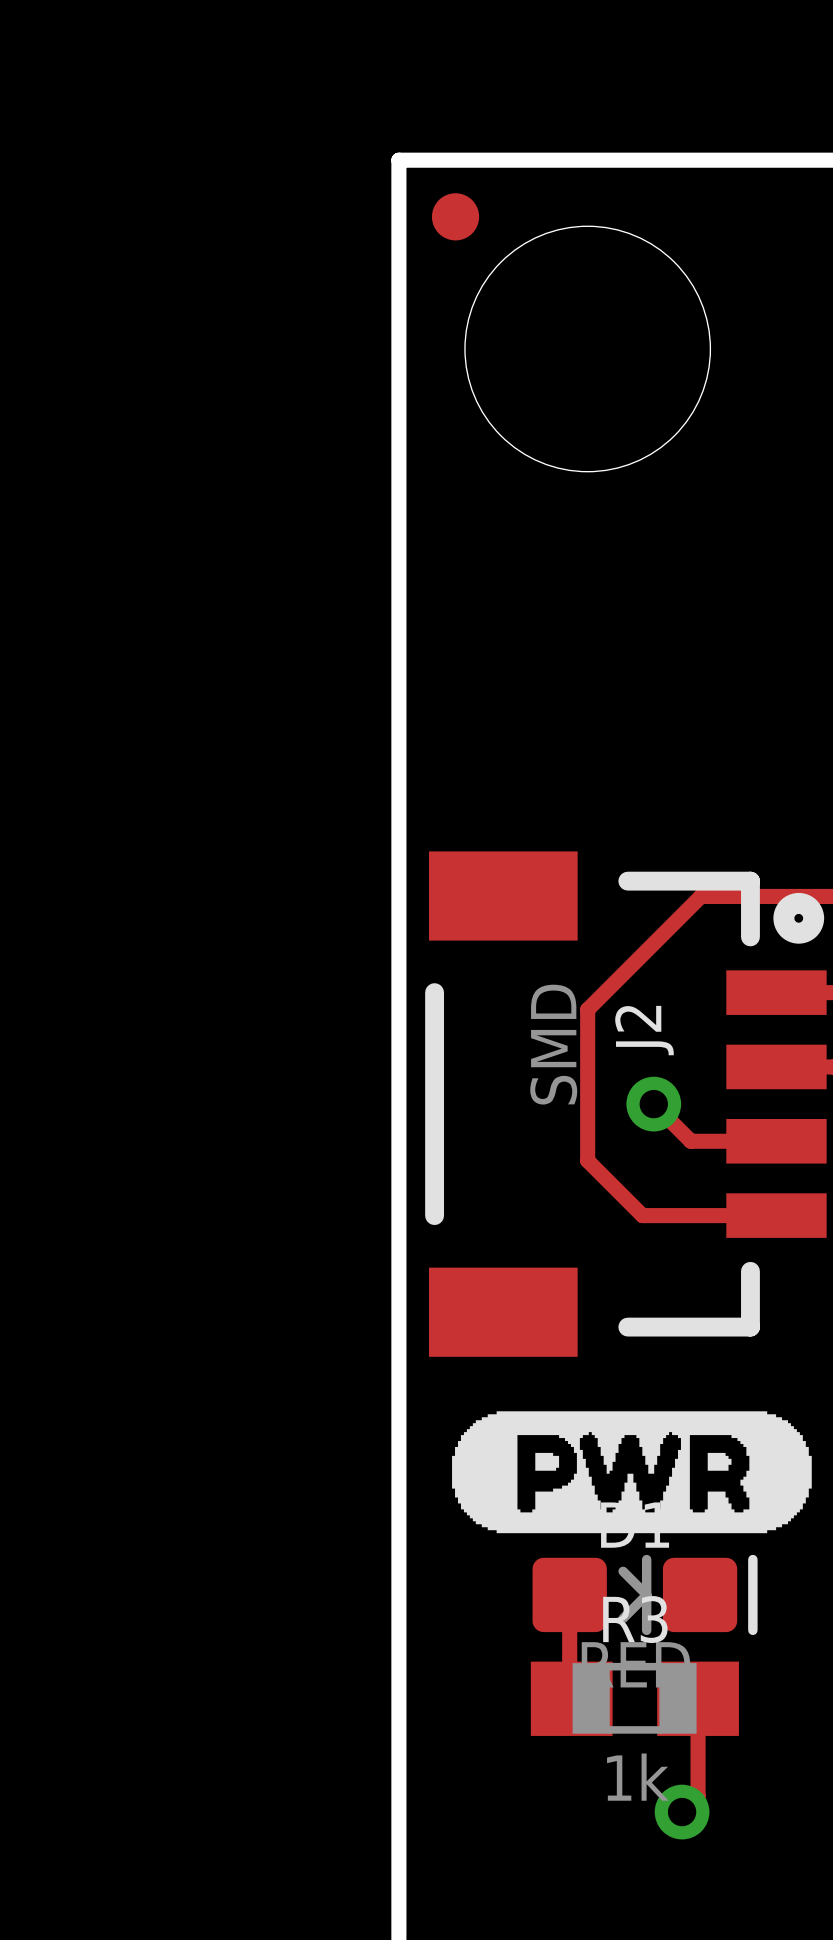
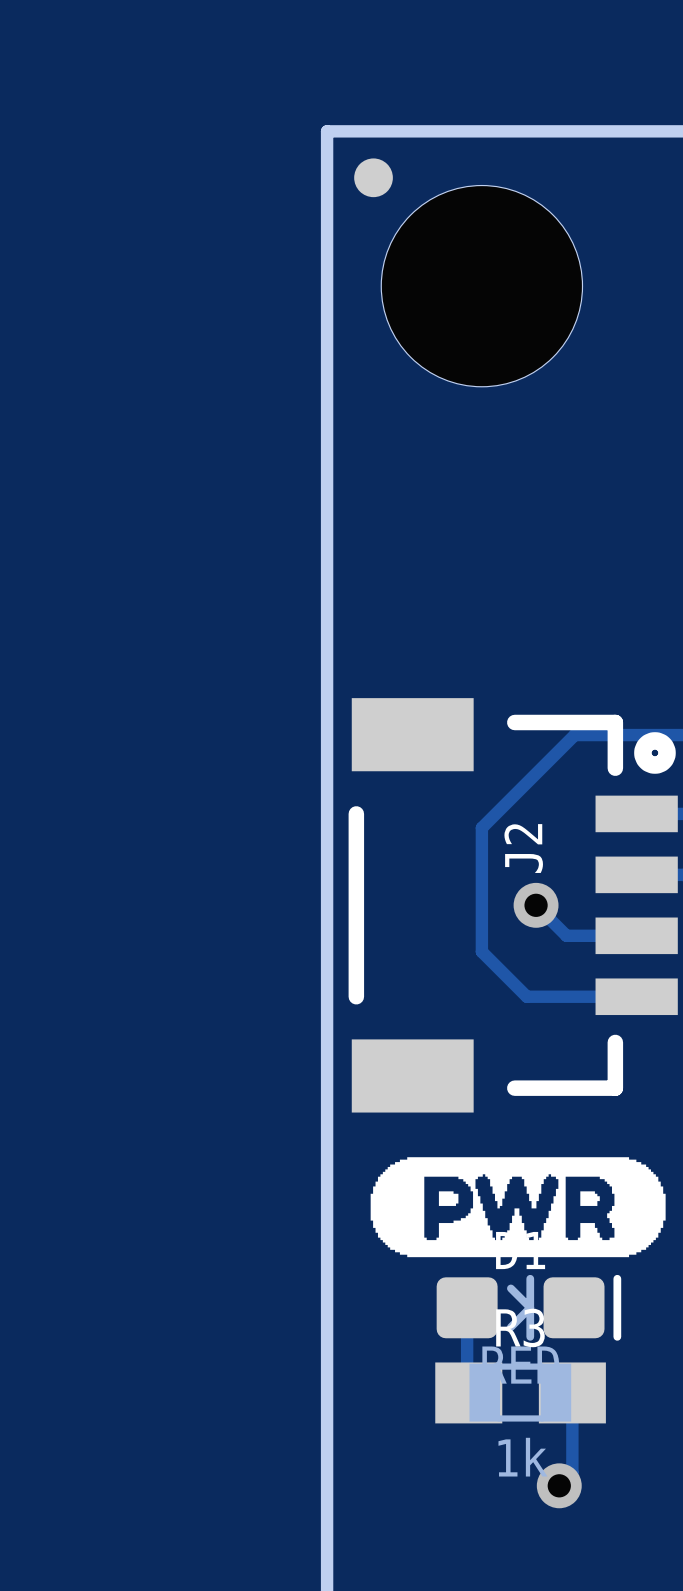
J2 value: SMD (553, 1044) -> none

